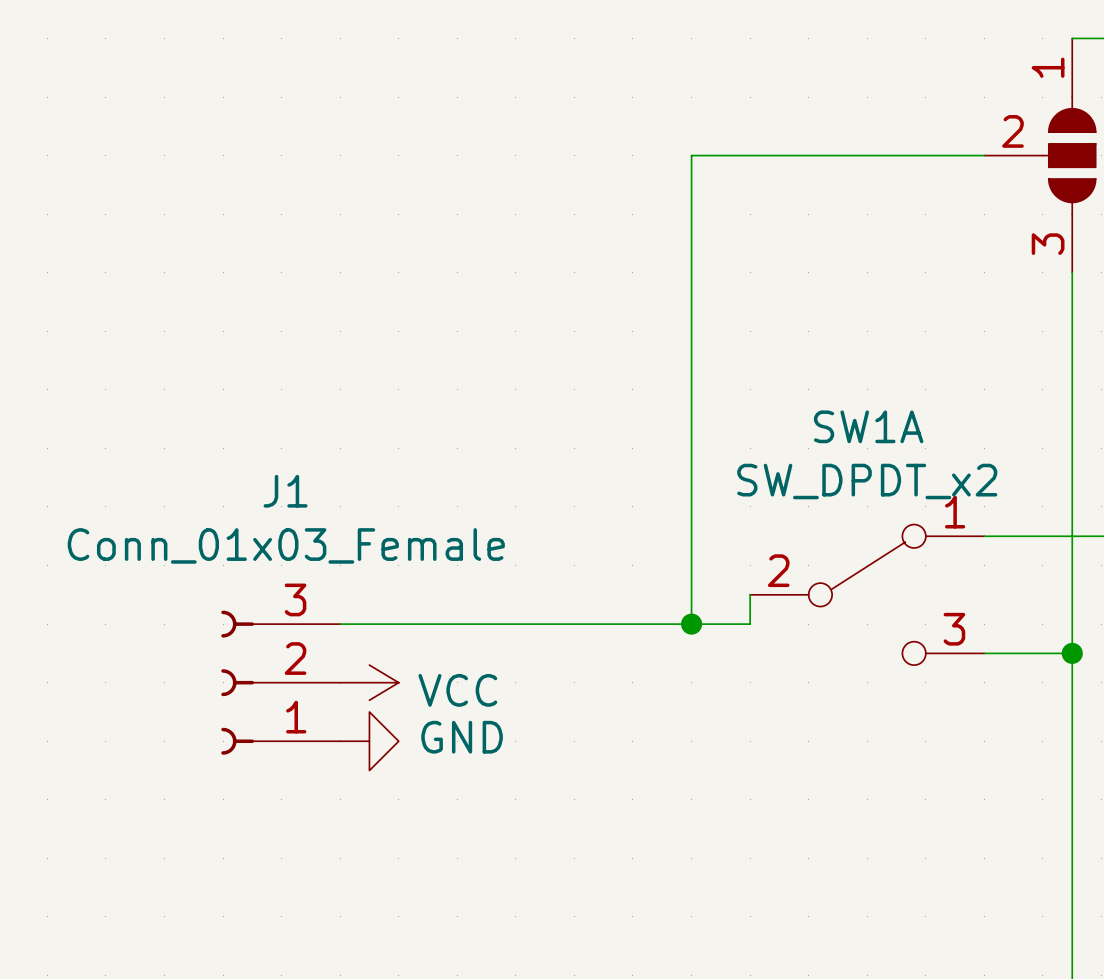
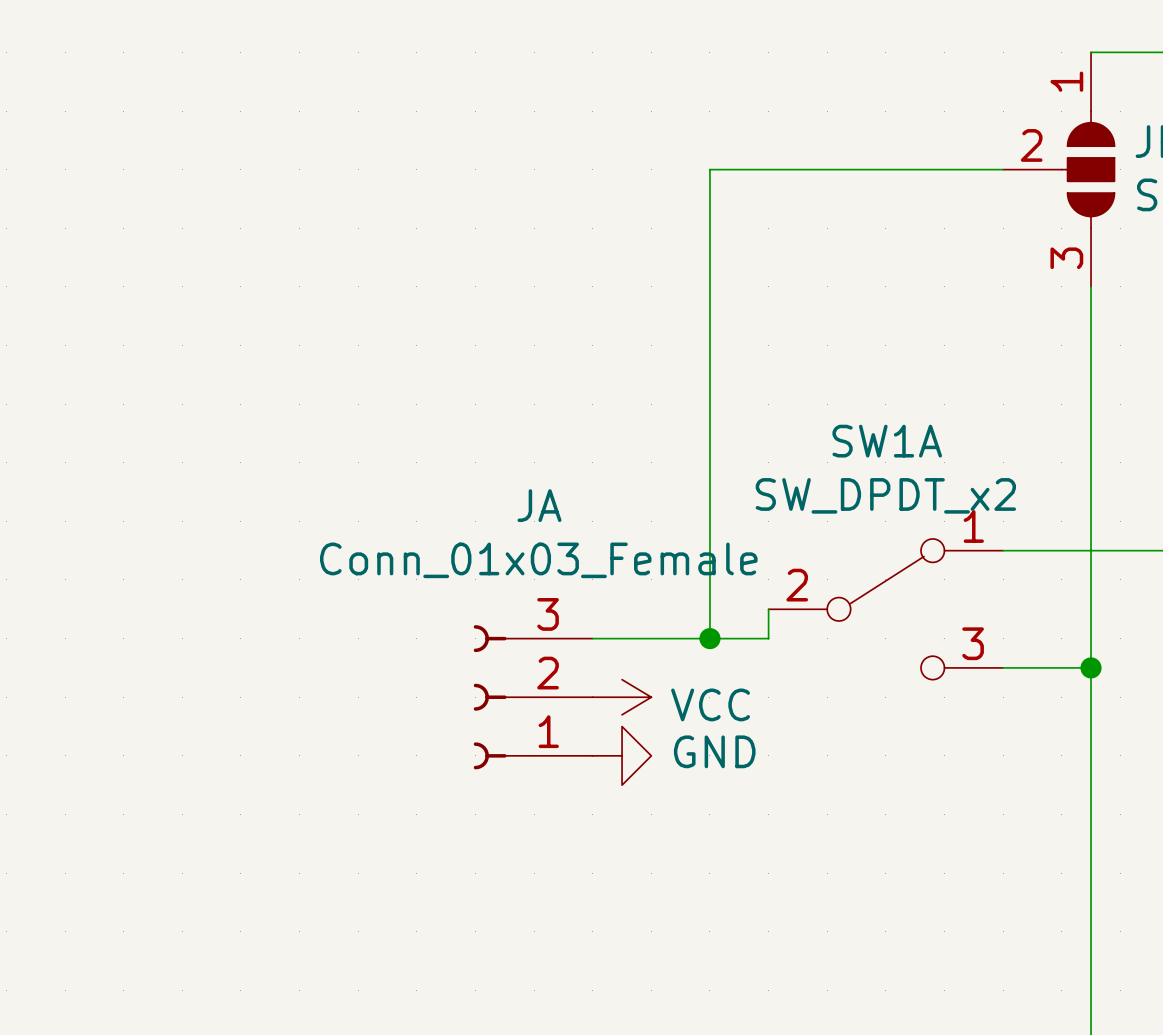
wire: (340, 624) (574, 624) -> none
J1: Conn_01x03_Female (280, 682) -> none
power symbol position: VCC (369, 682) -> VCC (622, 697)
JA: none -> Conn_01x03_Female (533, 697)
power symbol position: GND (369, 741) -> GND (622, 755)

